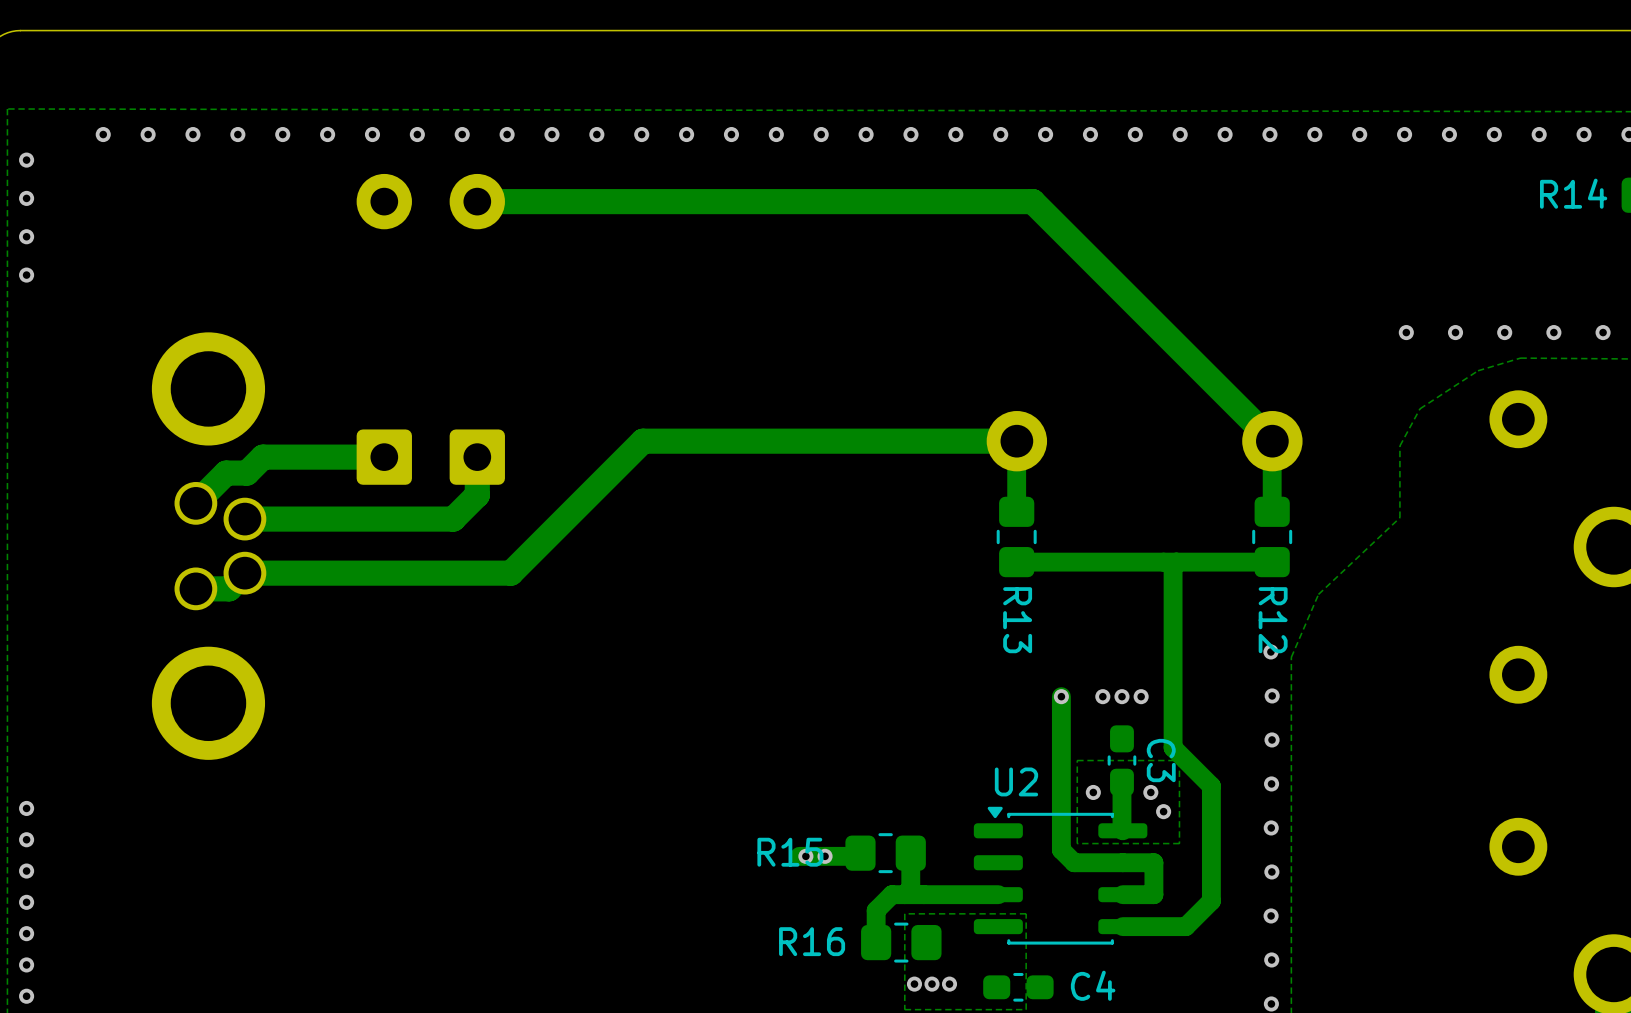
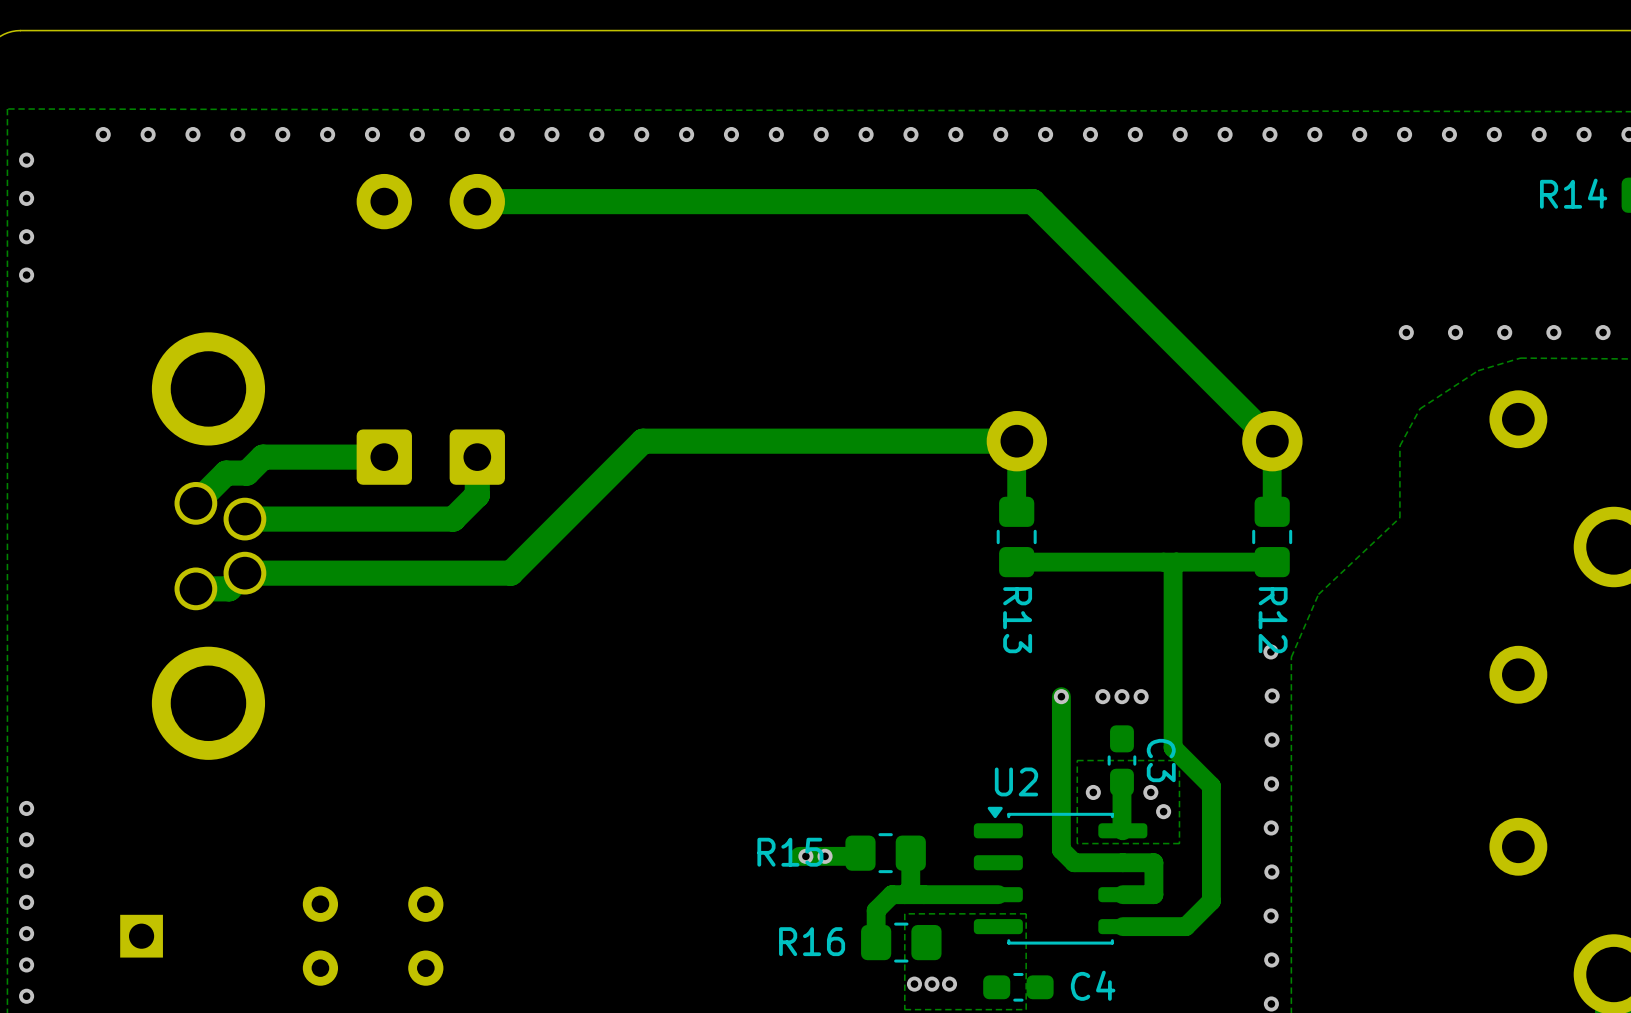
part: none -> (141, 936)
part: none -> (320, 936)
part: none -> (425, 936)

